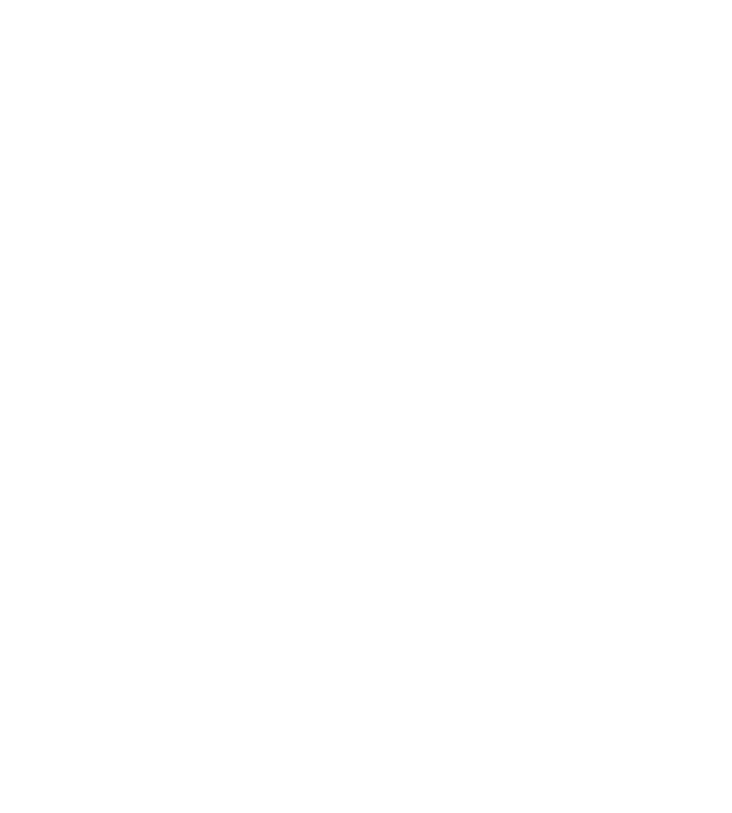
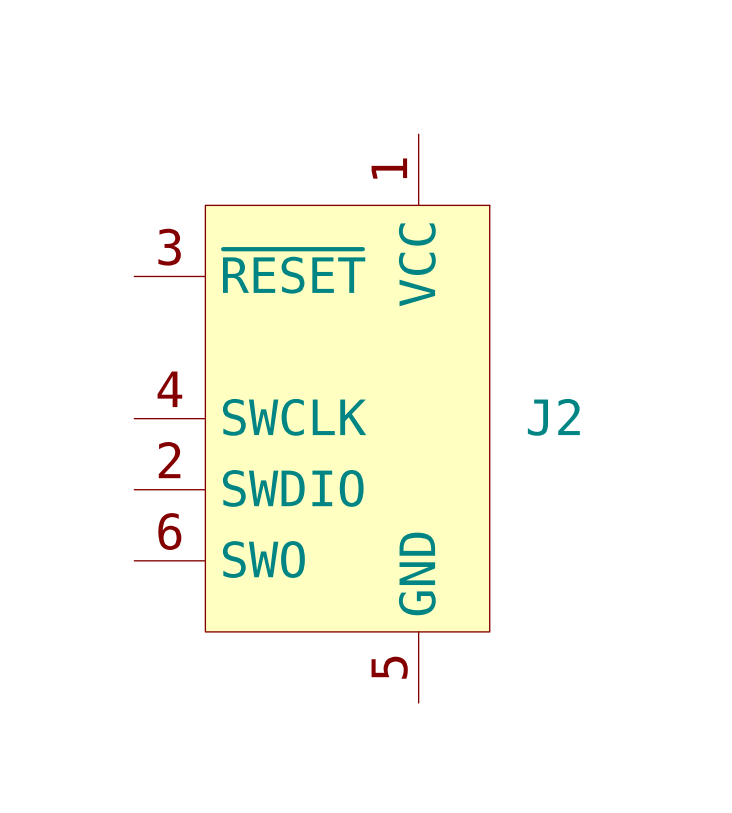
J2: none -> (312, 418)

